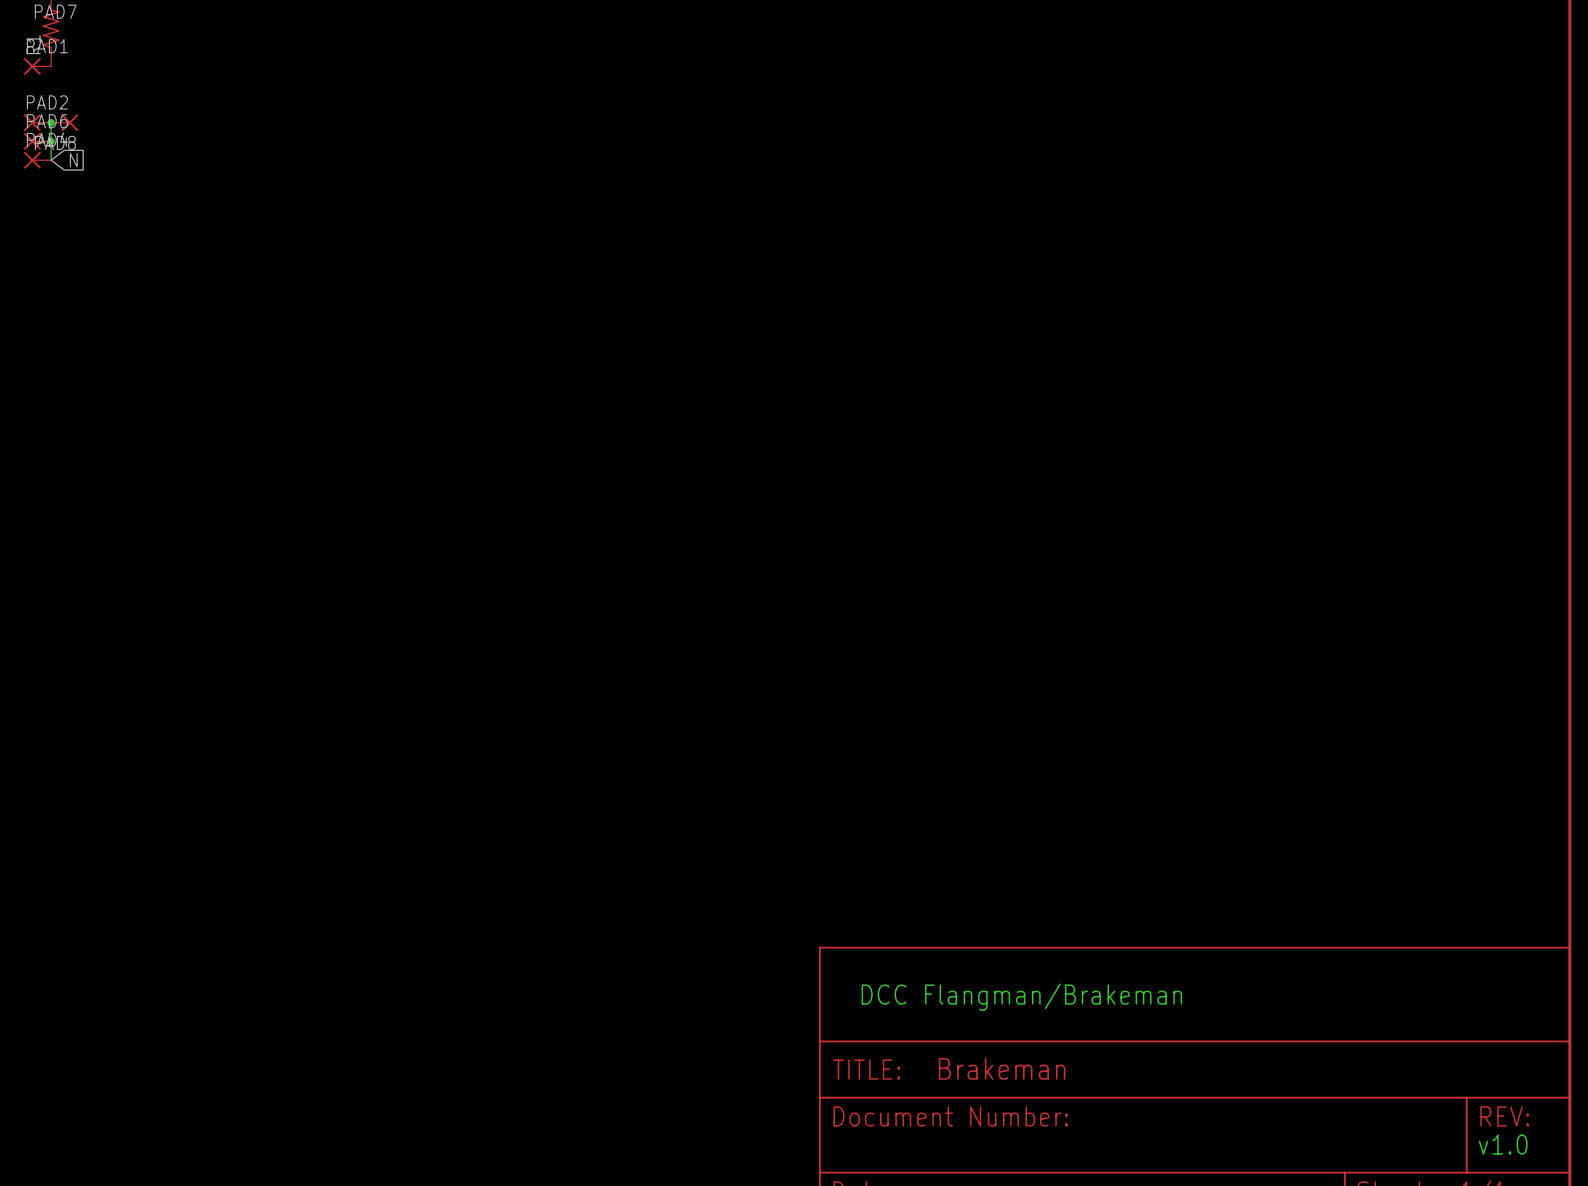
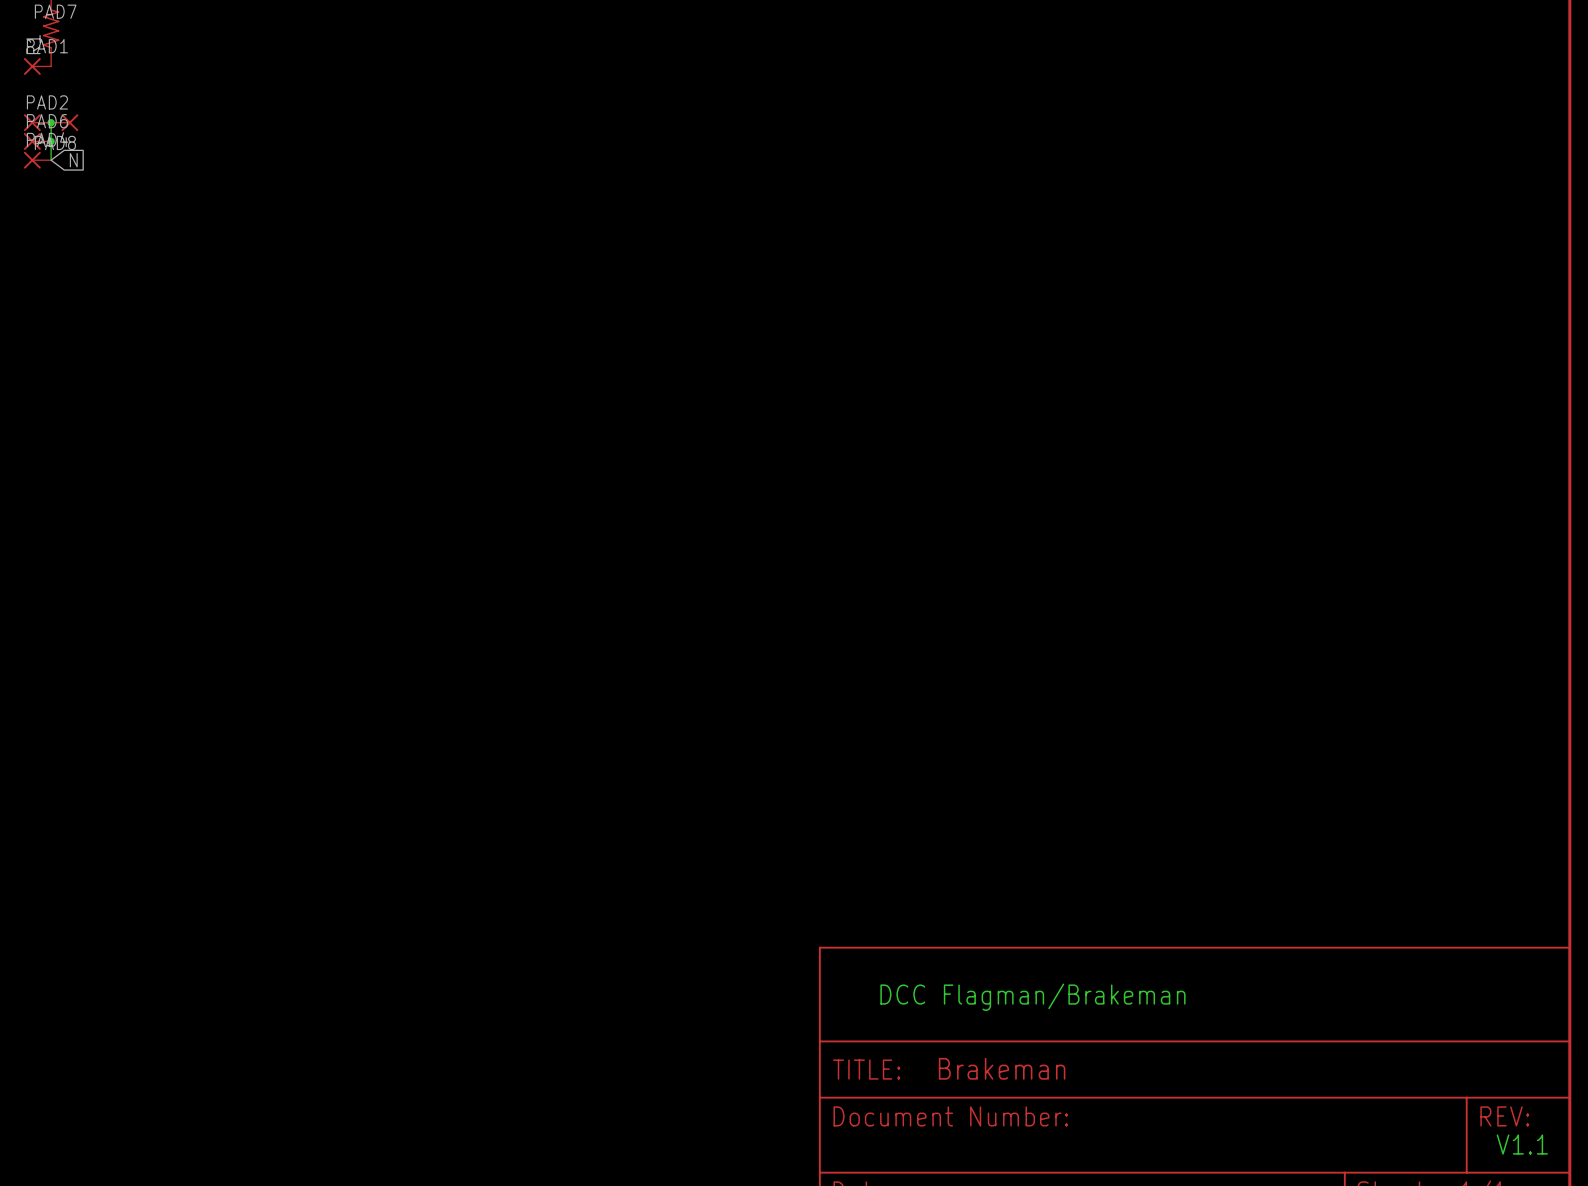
text: DCC Flangman/Brakeman (1021, 997) -> DCC Flagman/Brakeman (1032, 997)
text: v1.0 (1503, 1144) -> none
text: none -> V1.1 (1522, 1144)

